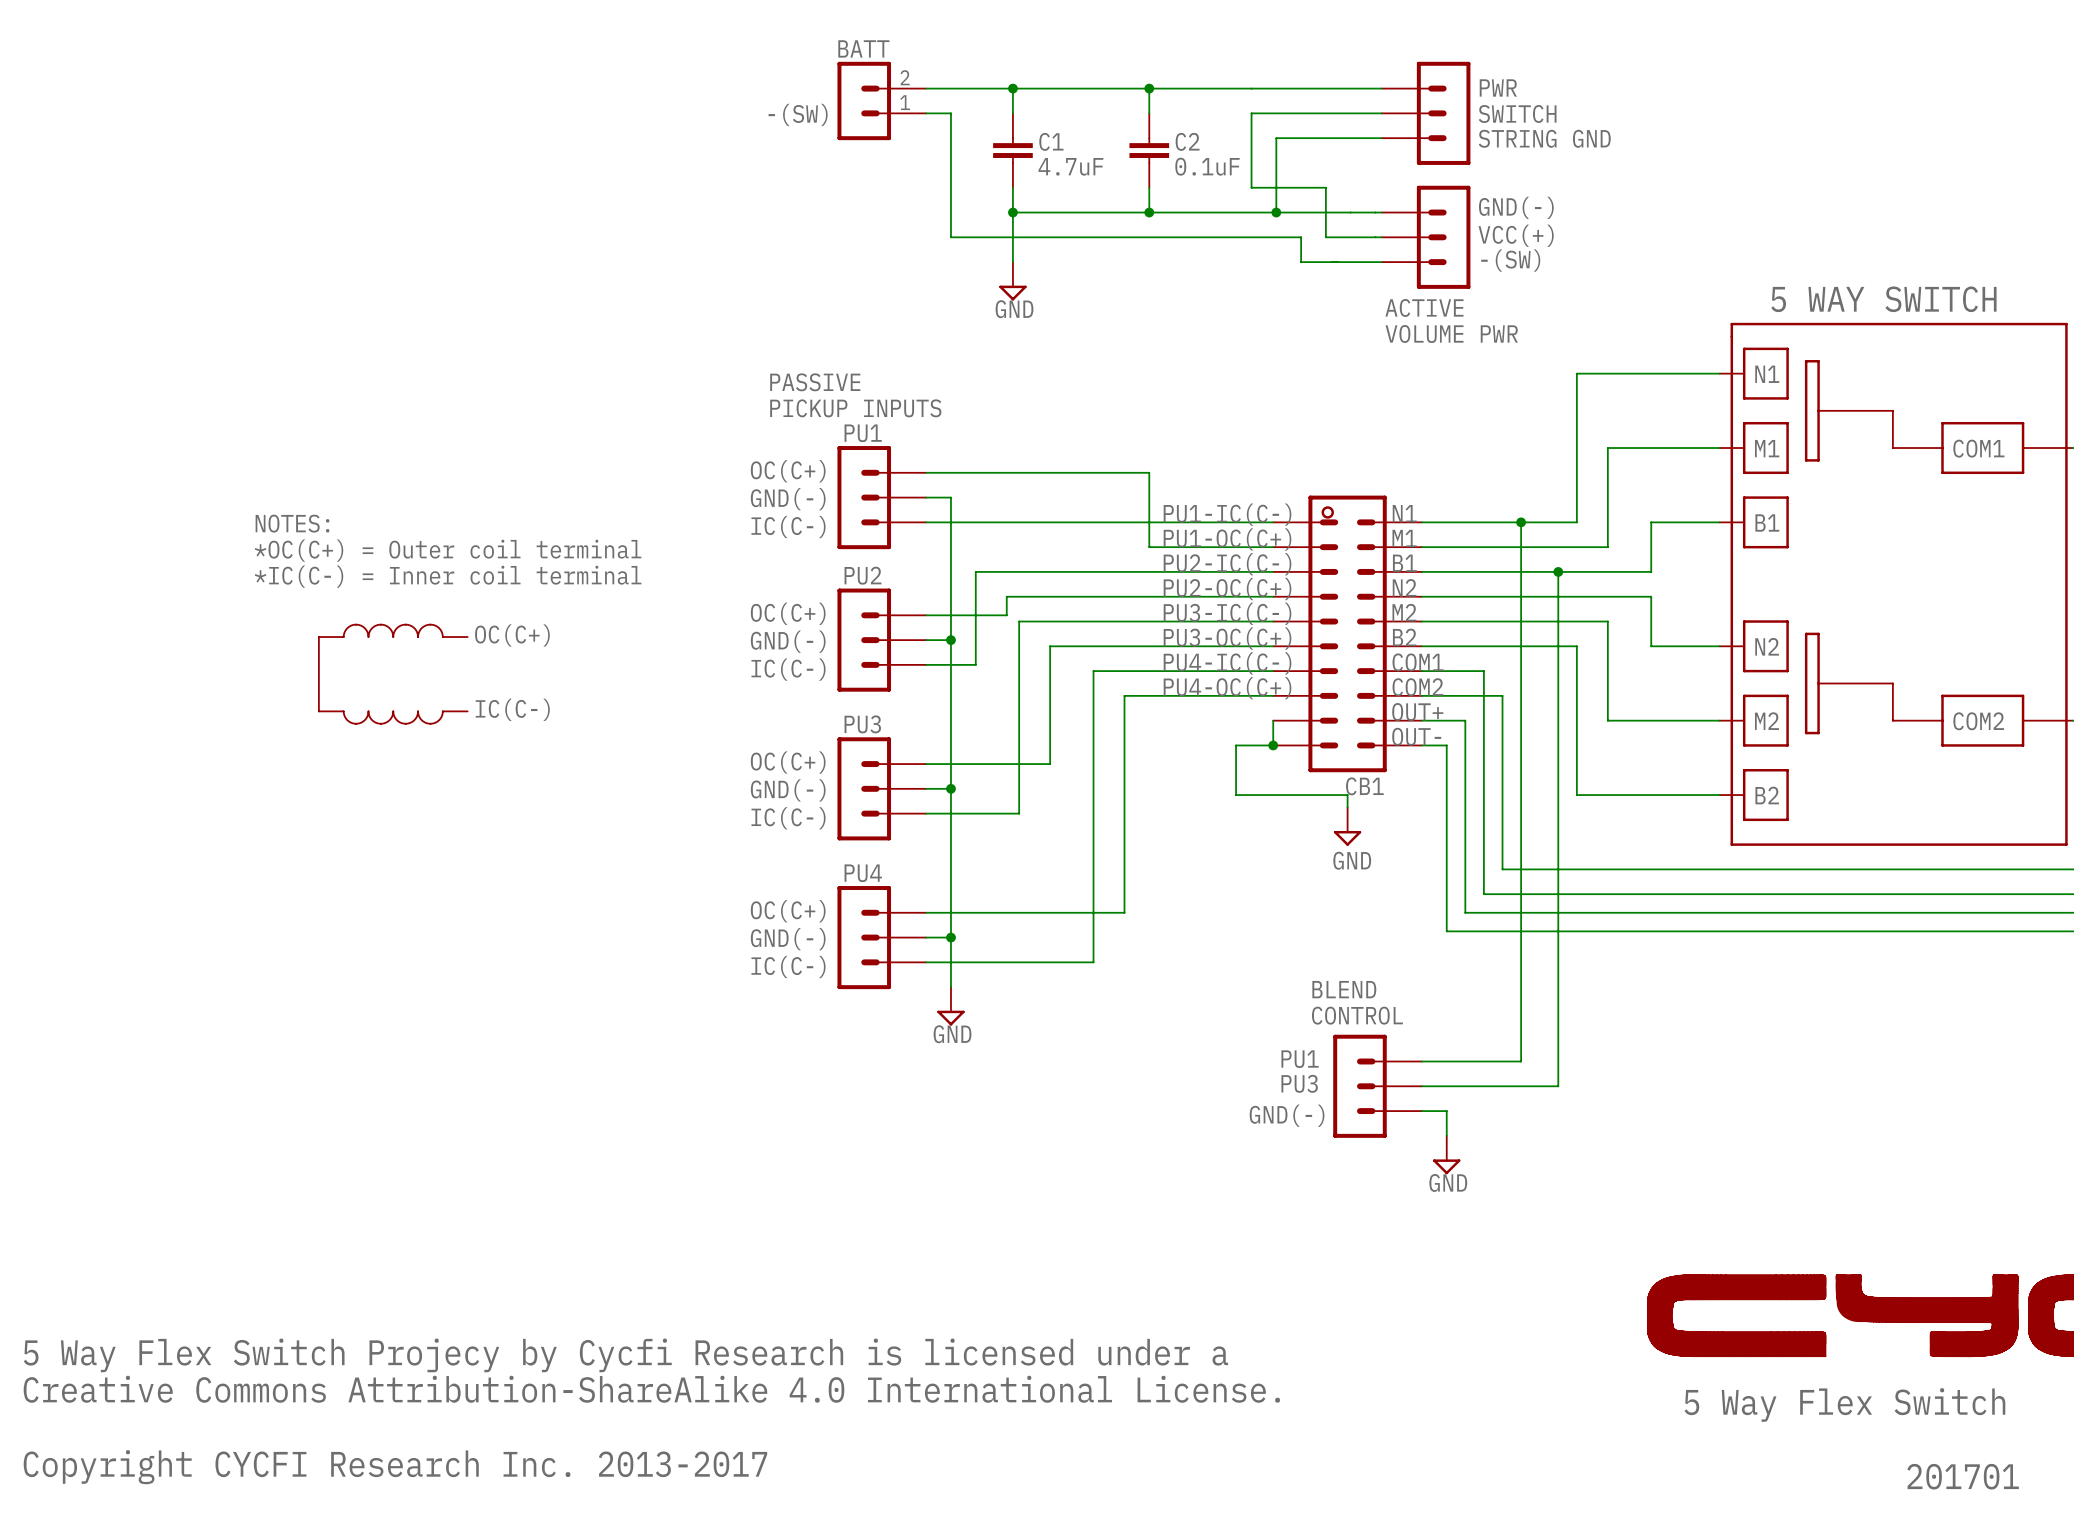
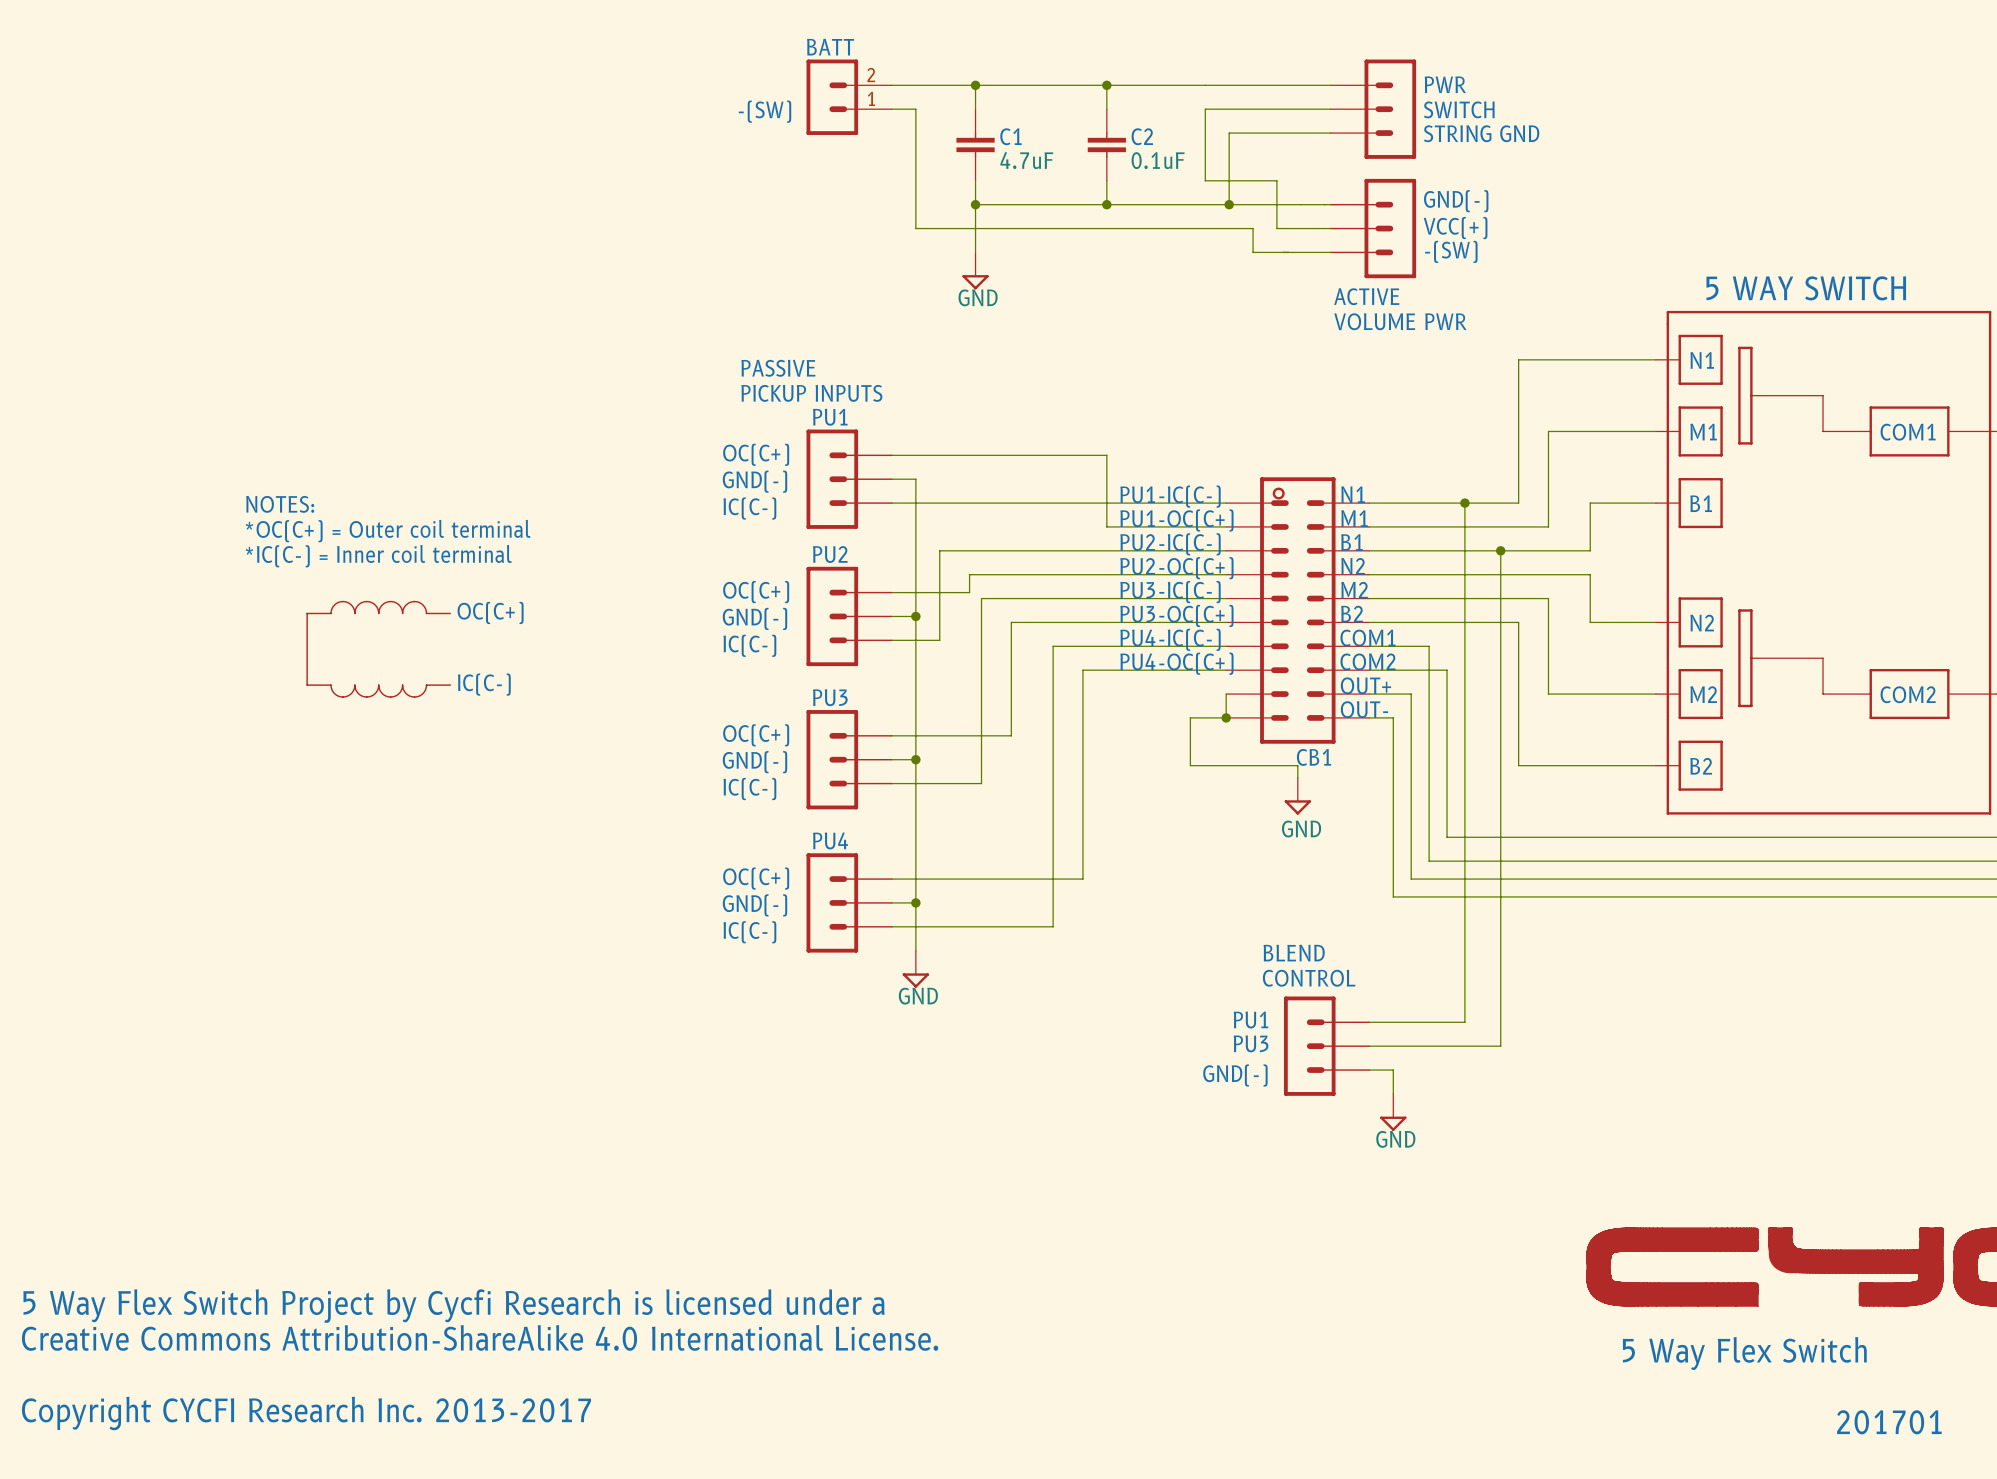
text: 5 Way Flex Switch Projecy by Cycfi Research is licensed under a (625, 1355) -> 5 Way Flex Switch Project by Cycfi Research is licensed under a (454, 1306)

